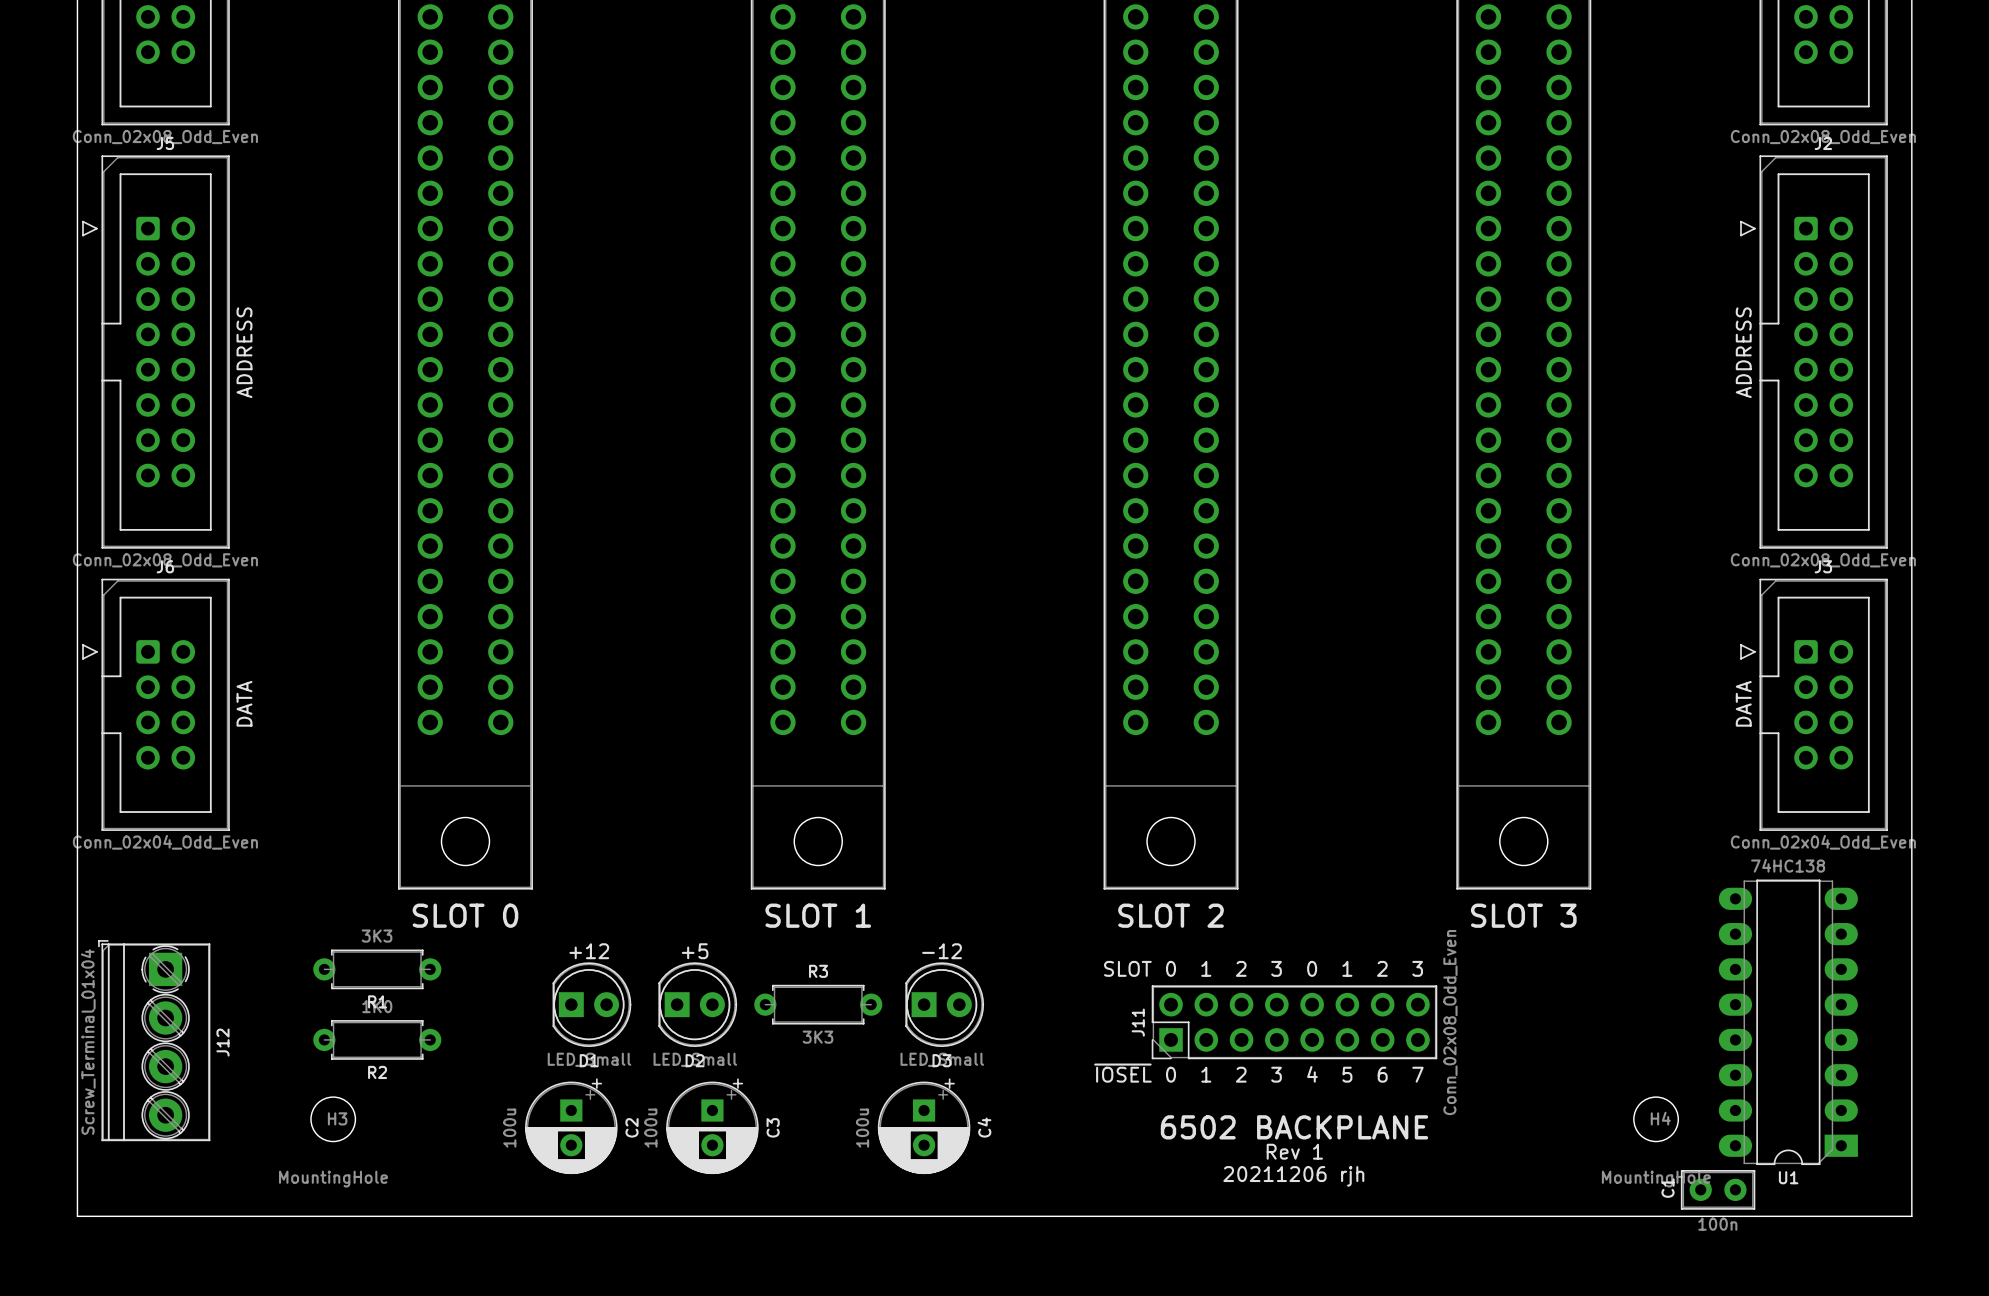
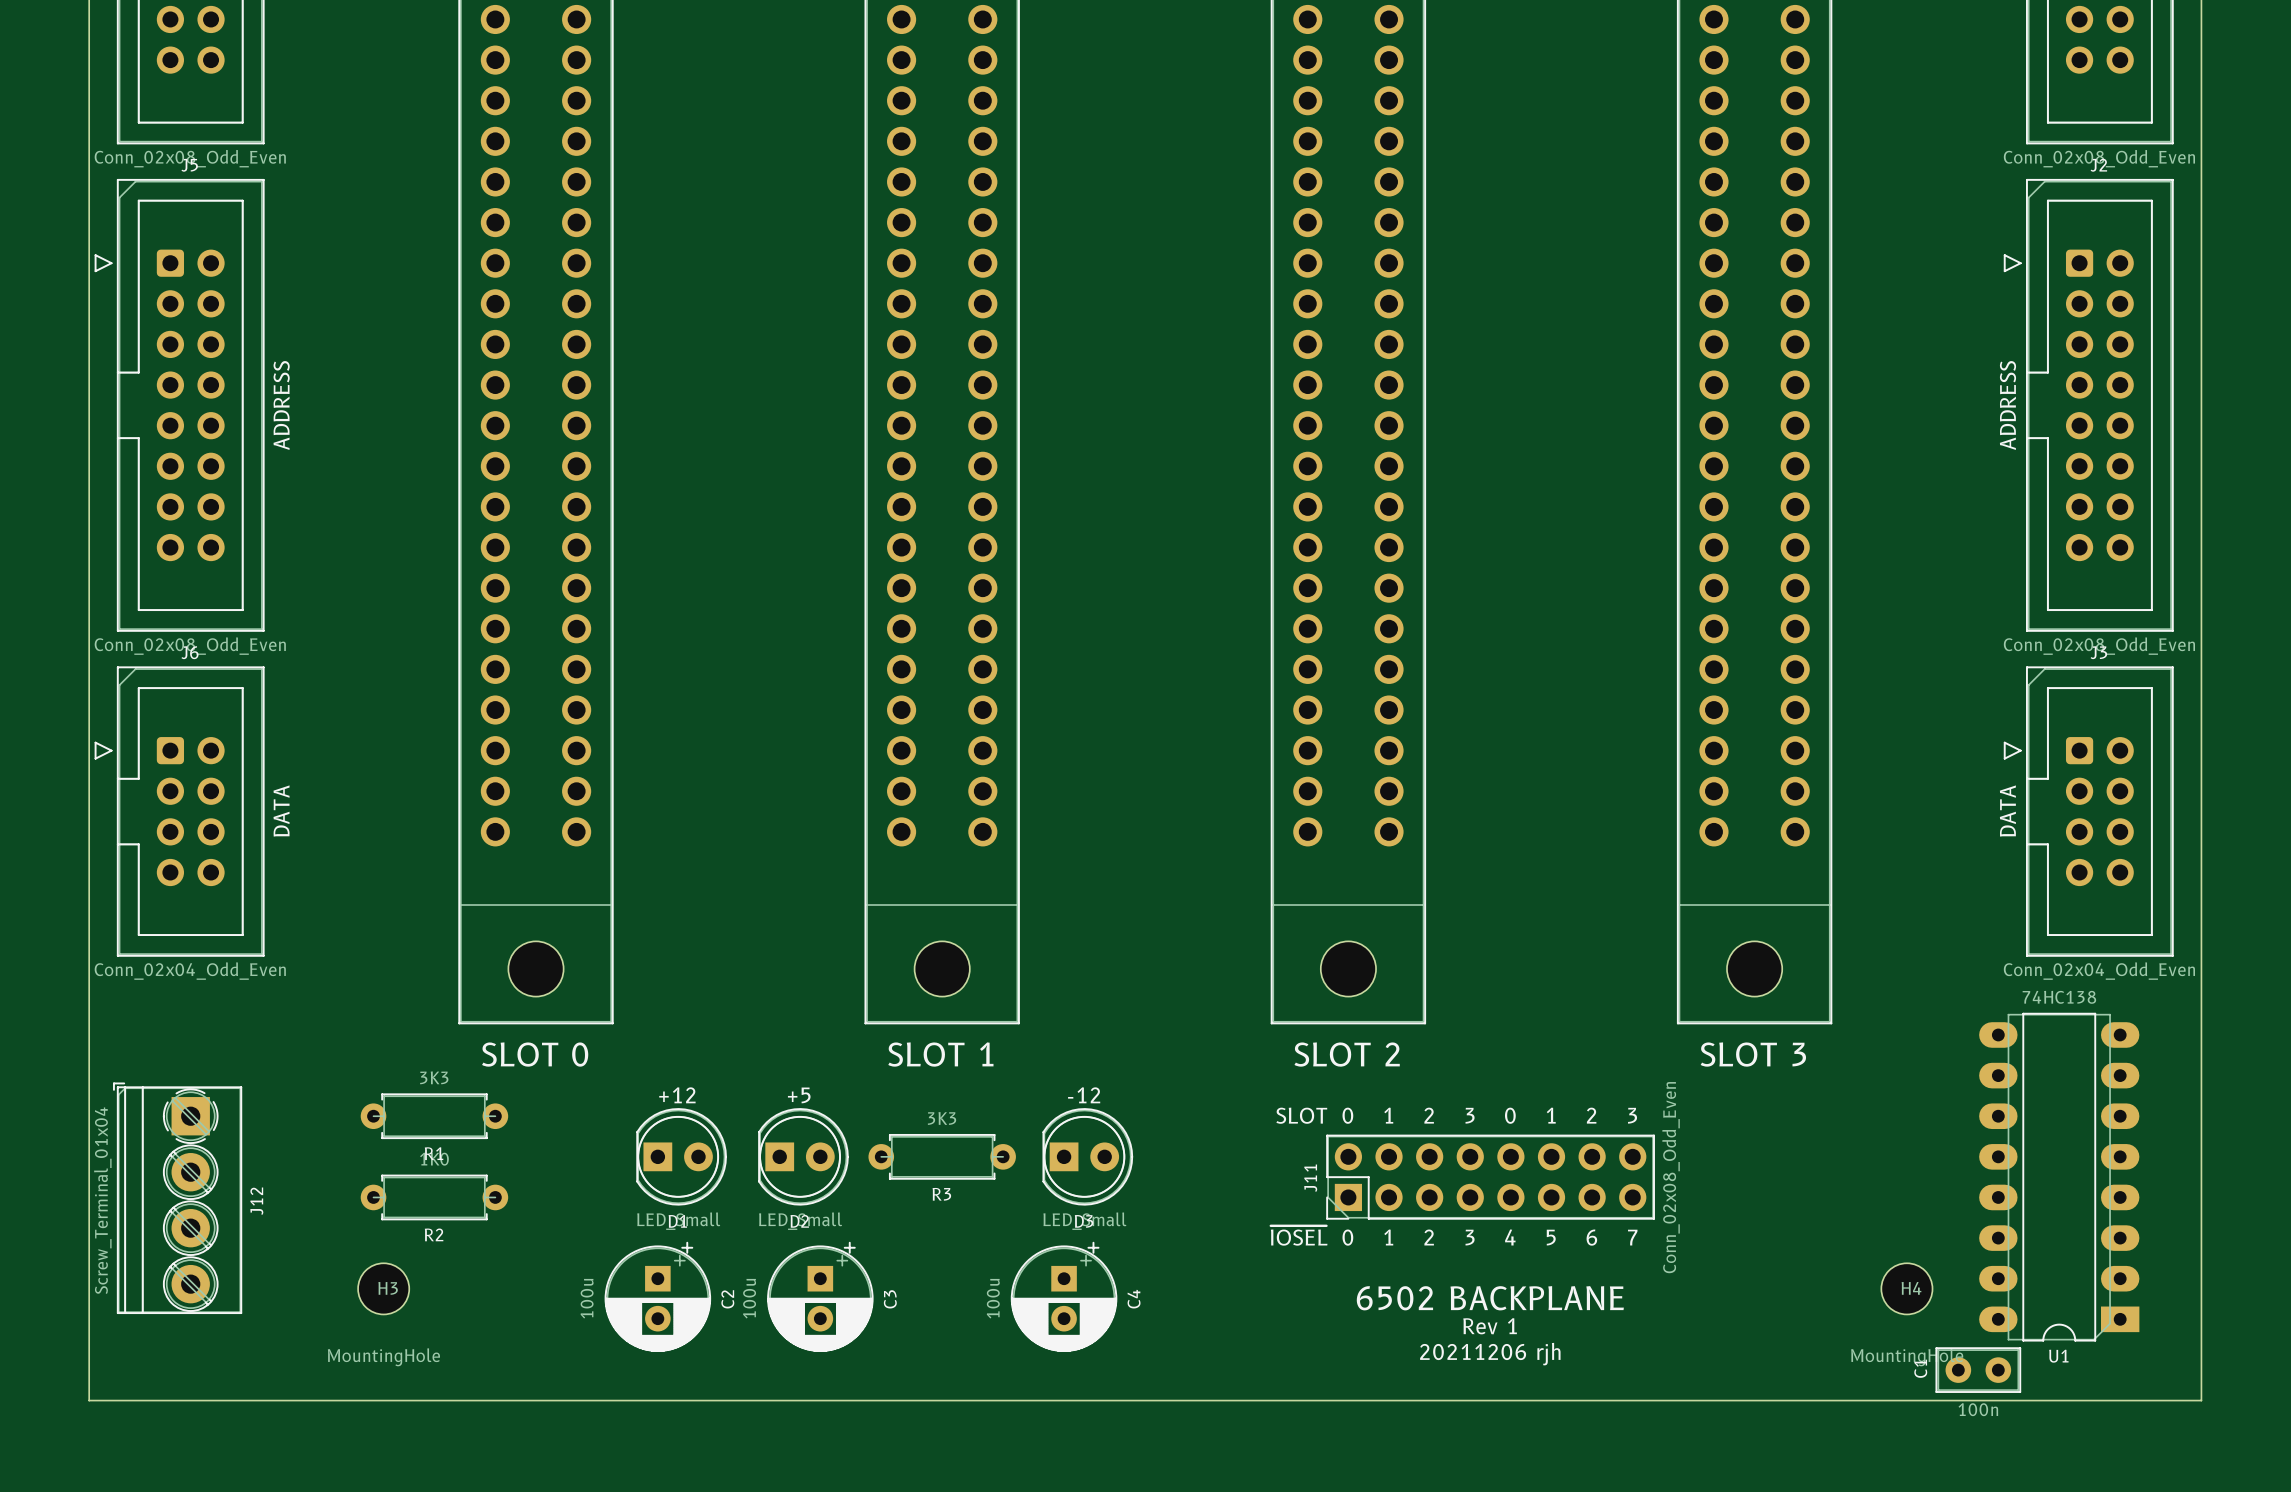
R3 name position: R3 (818, 971) -> R3 (941, 1194)
R3 value position: 3K3 (817, 1037) -> 3K3 (942, 1118)

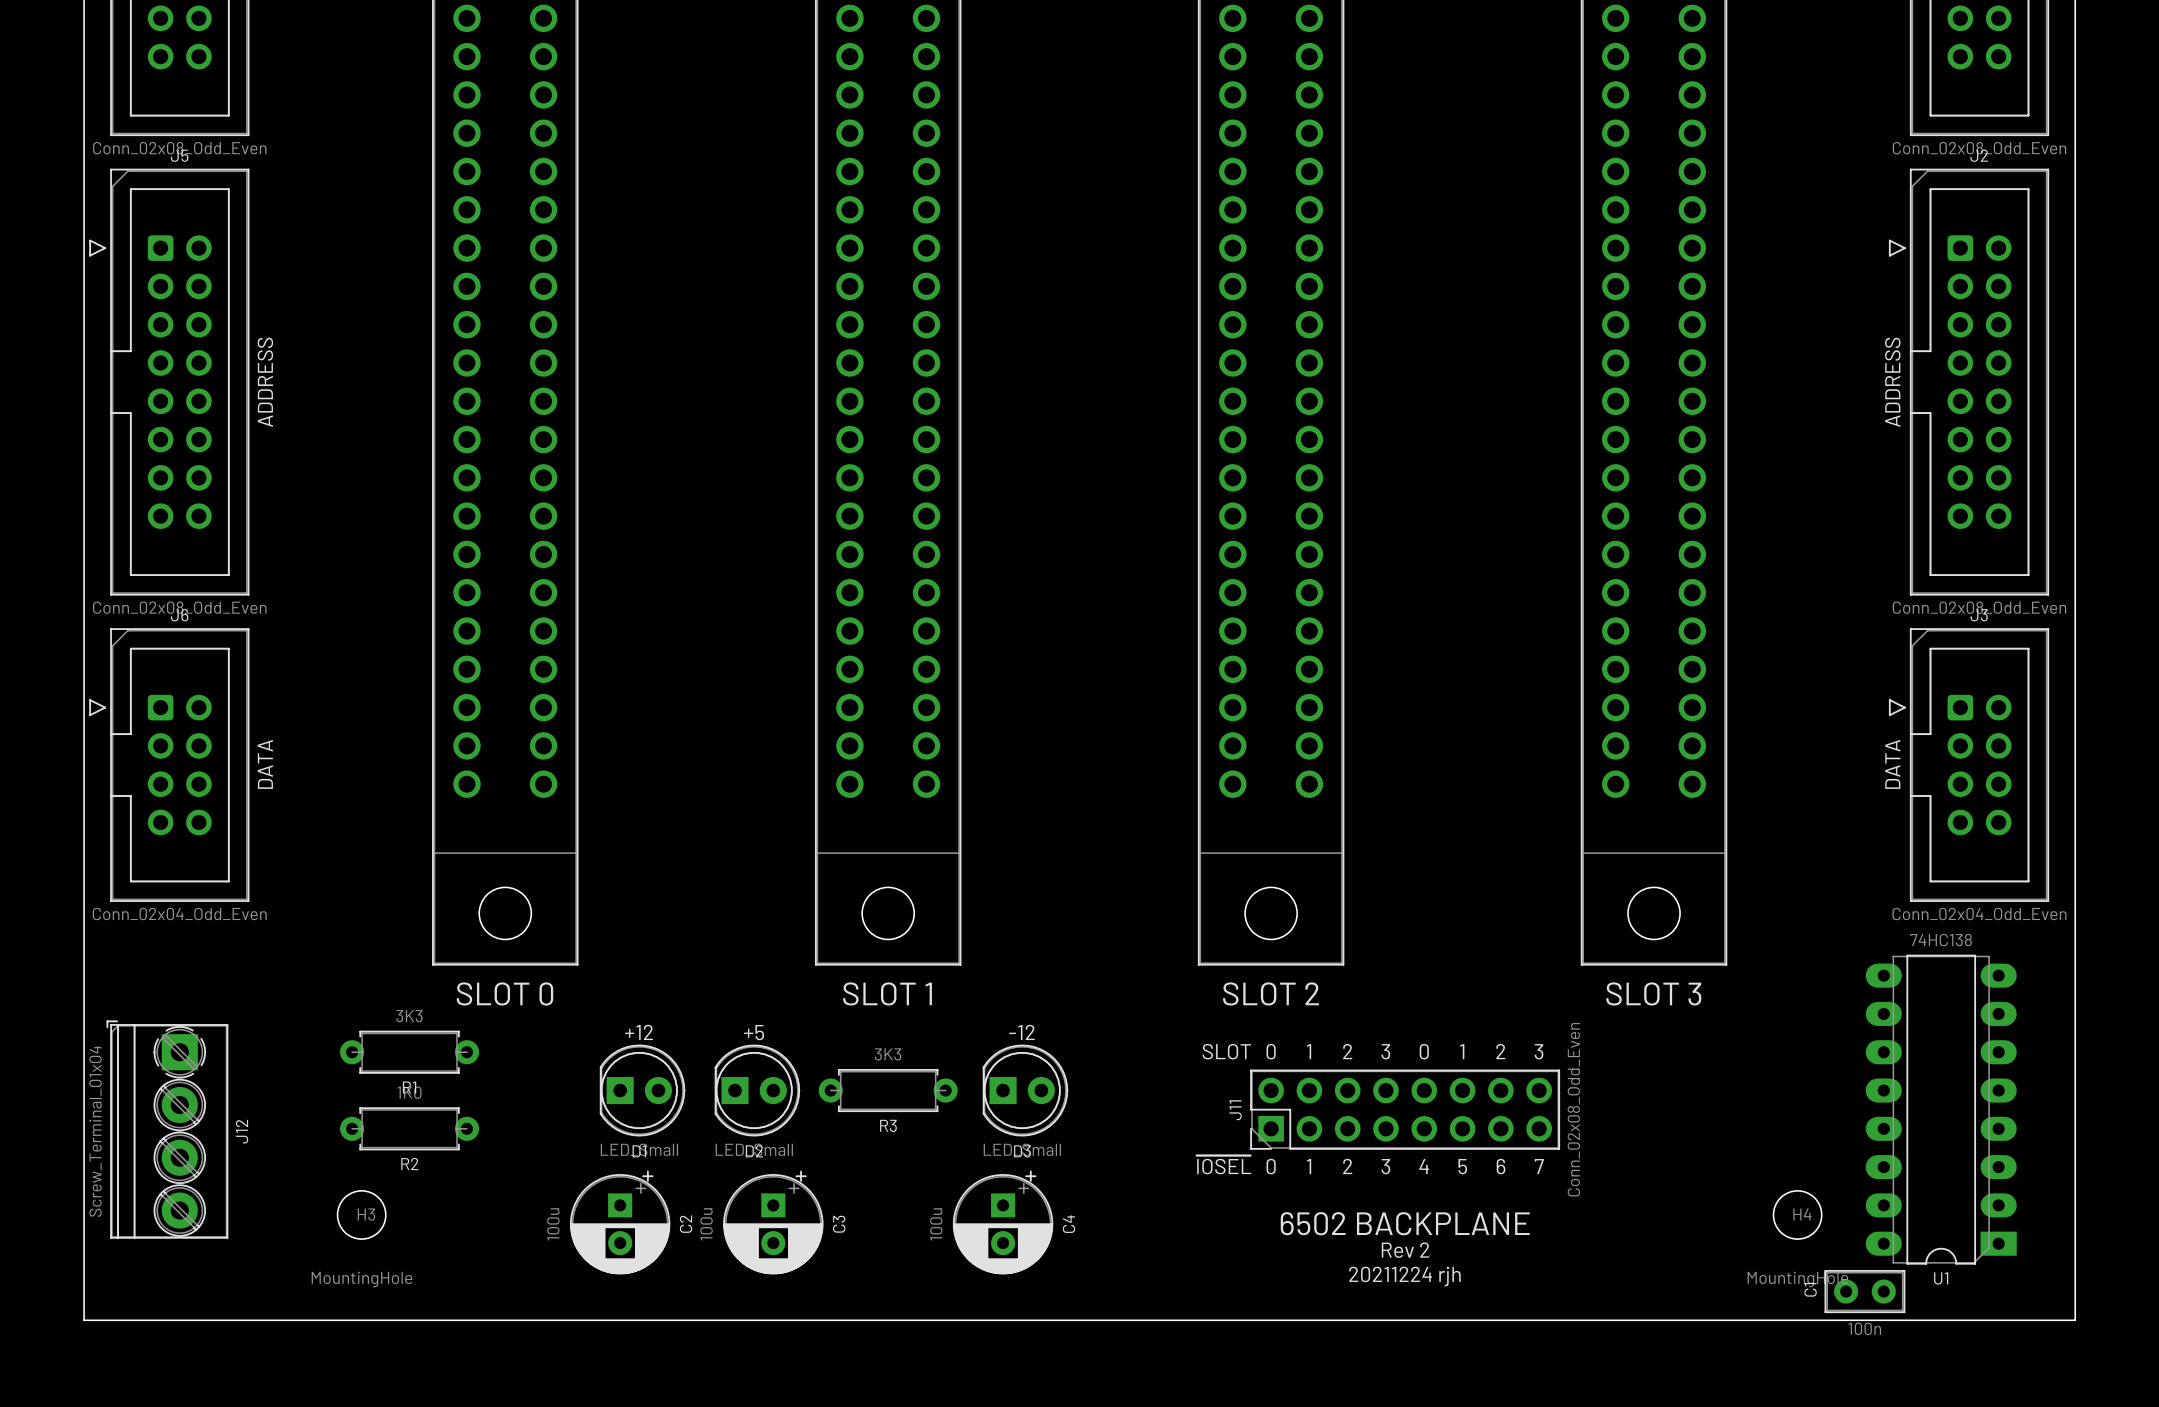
text: Rev 1 (1490, 1326) -> Rev 2 (1405, 1250)
text: 20211206 rjh (1490, 1354) -> 20211224 rjh (1404, 1276)

